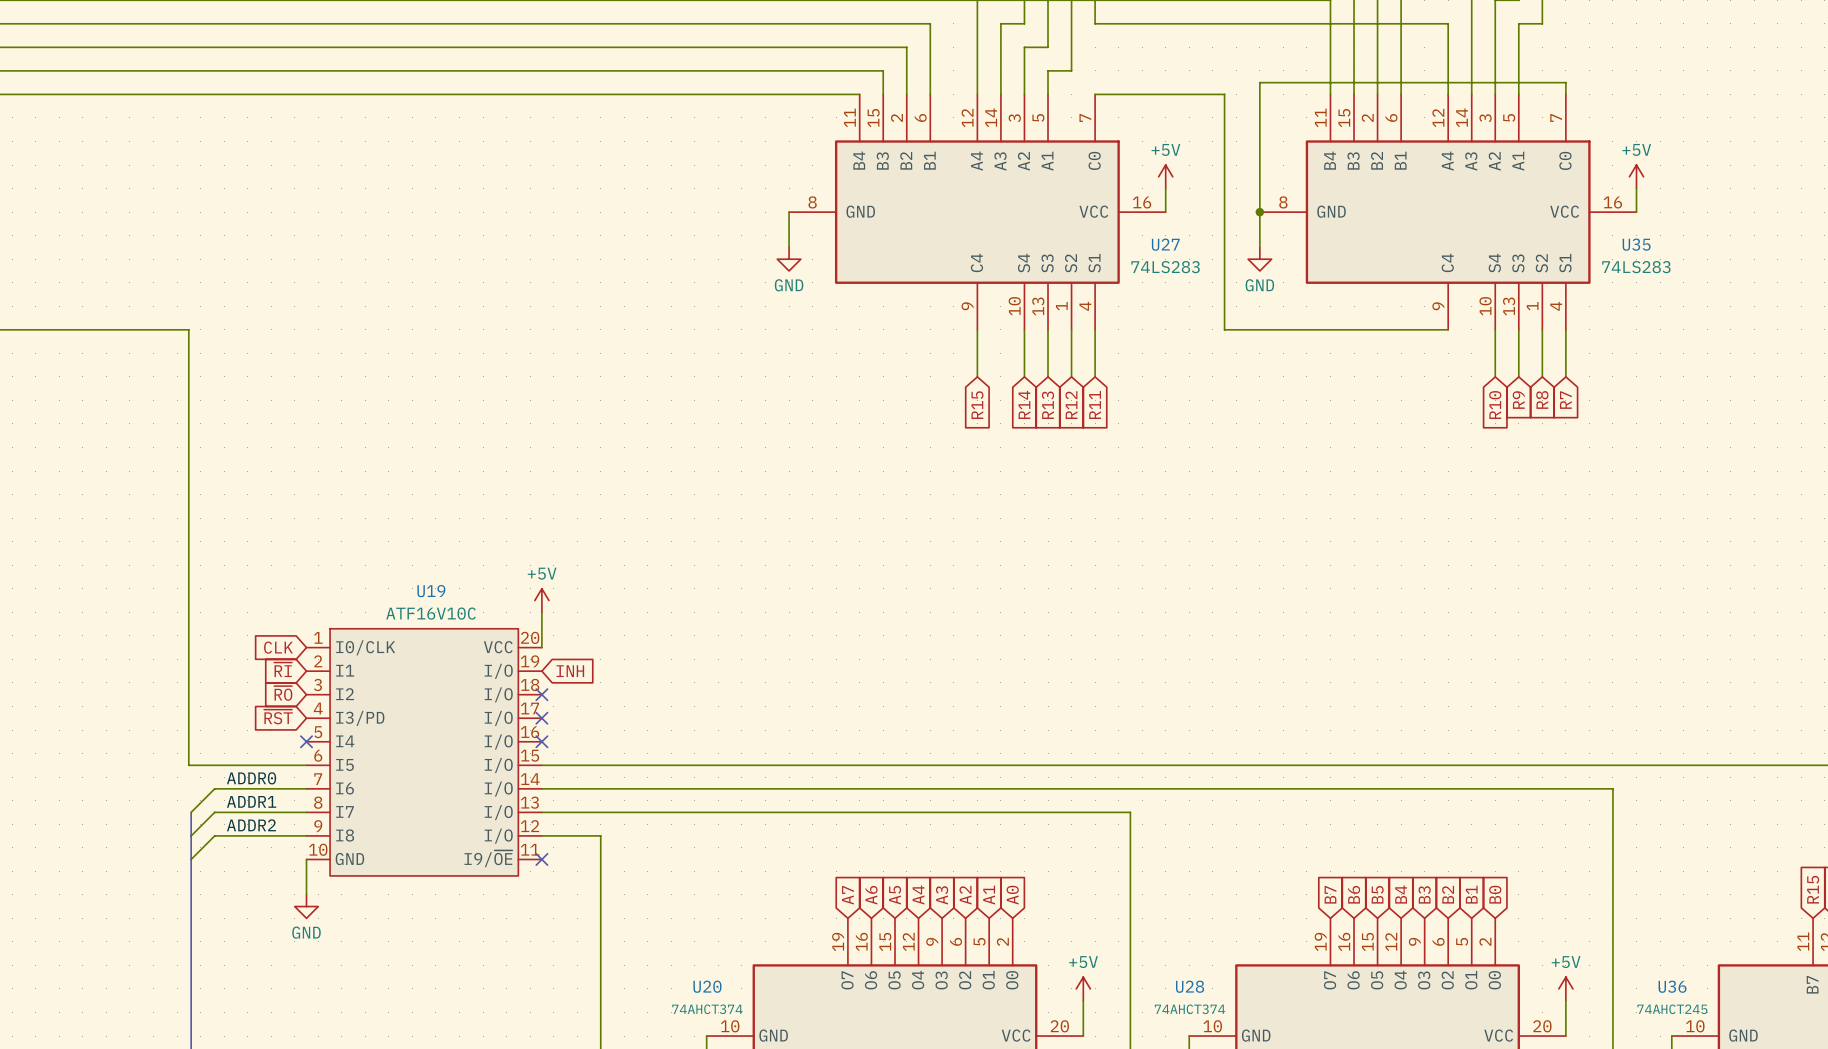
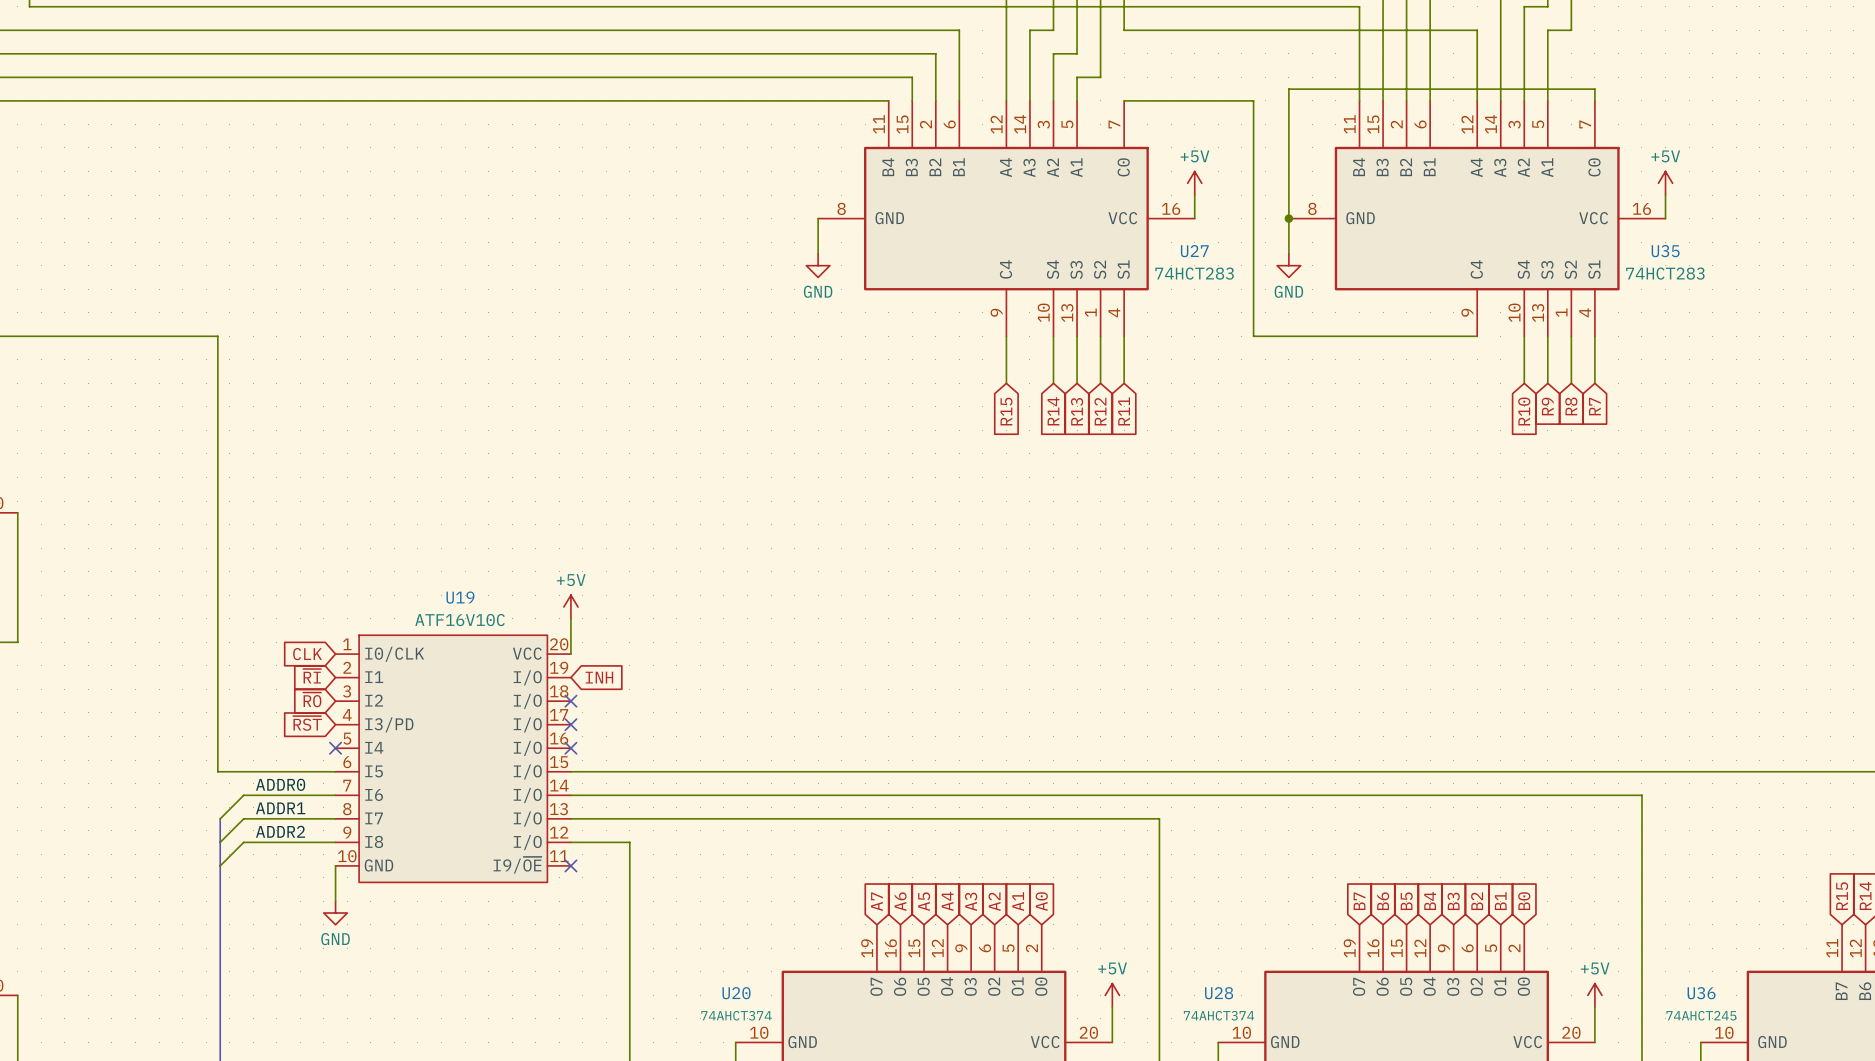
U27 value: 74LS283 (1165, 267) -> 74HCT283 (1194, 273)
U35 value: 74LS283 (1636, 267) -> 74HCT283 (1665, 273)

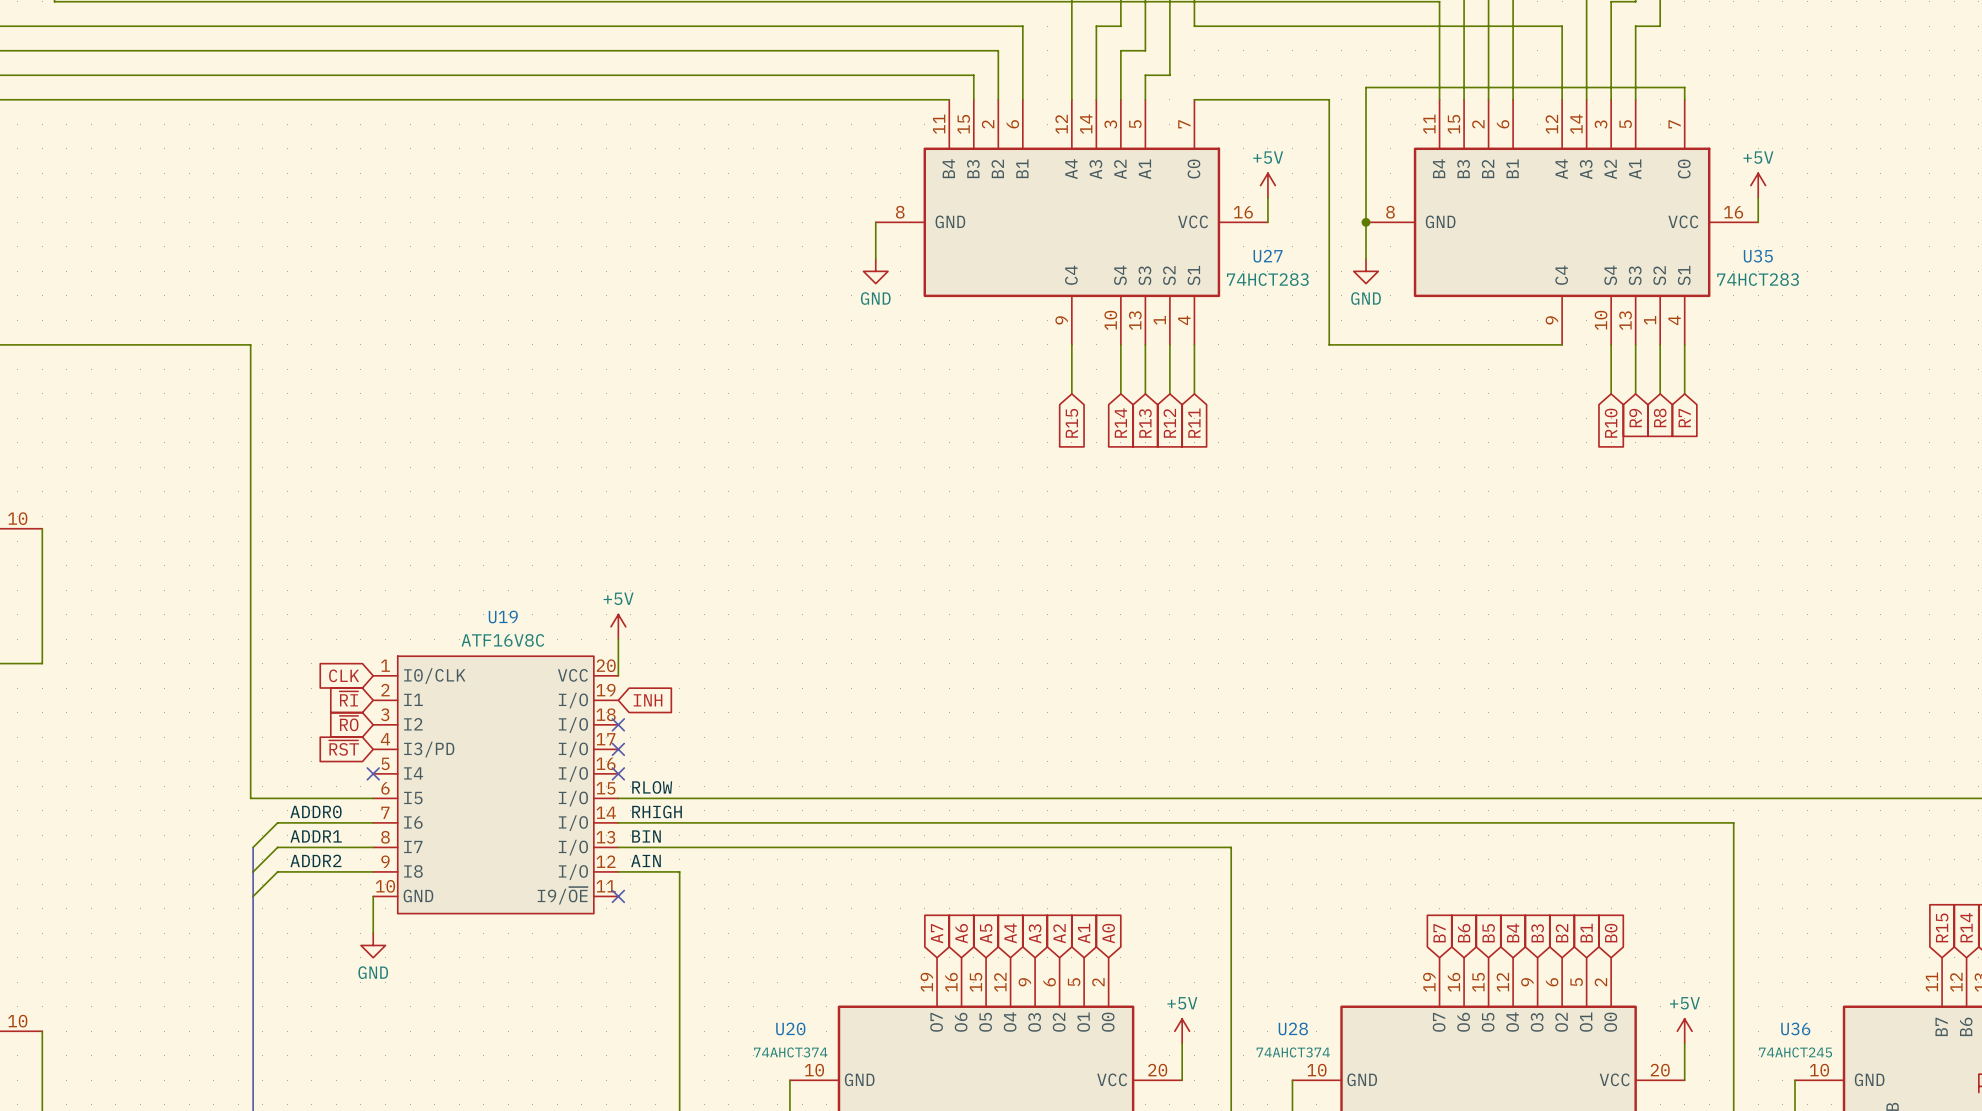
U19 value: ATF16V10C (460, 620) -> ATF16V8C (502, 640)
label: none -> RLOW (652, 787)
label: none -> RHIGH (657, 811)
label: none -> BIN (646, 836)
label: none -> AIN (645, 860)

